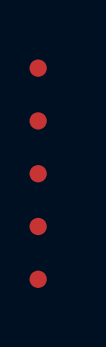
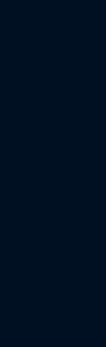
part: (38, 68) -> none
part: (38, 120) -> none
part: (38, 173) -> none
part: (38, 226) -> none
part: (38, 279) -> none

